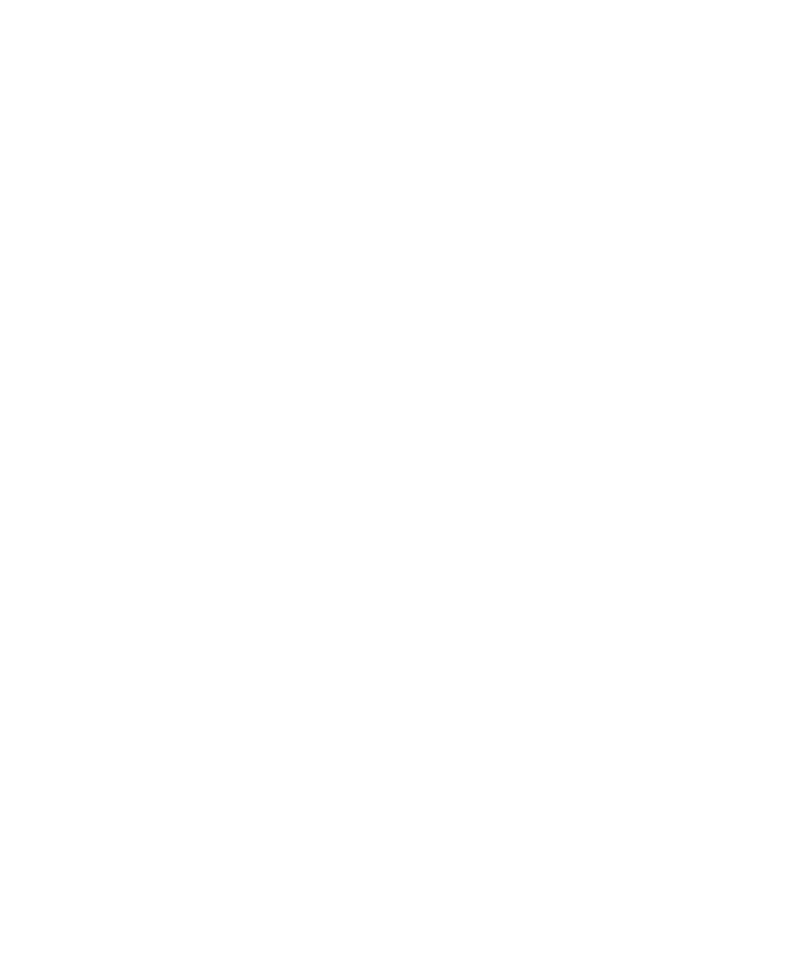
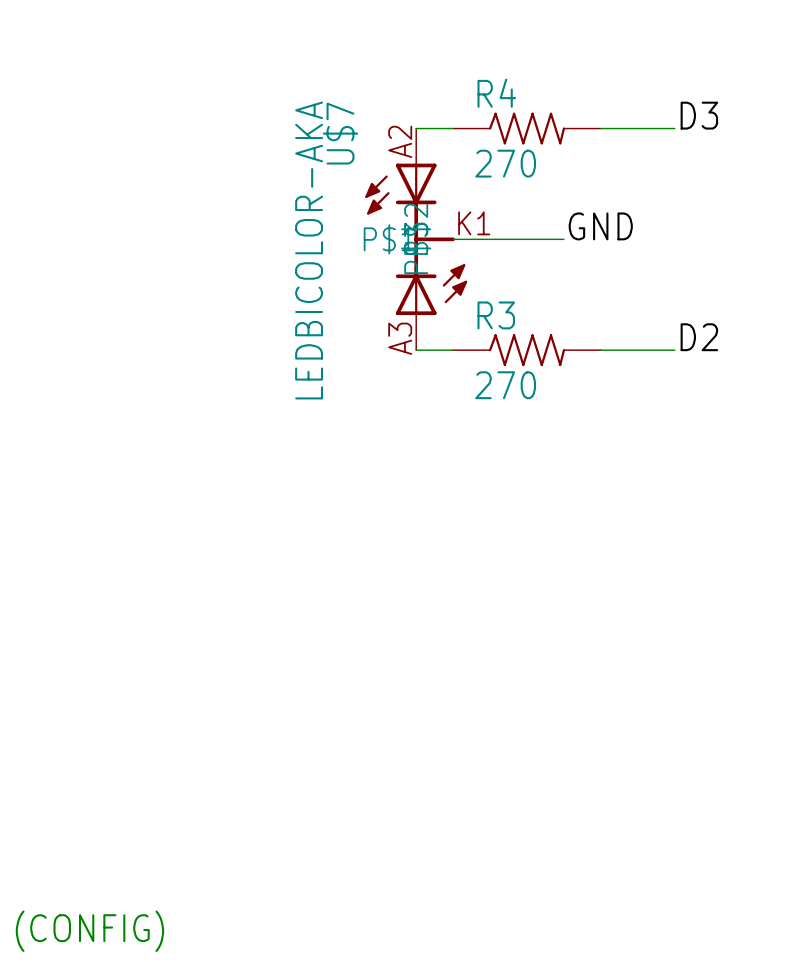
label: none -> D3 (699, 115)
wire: none -> (416, 128) (453, 128)
R4: none -> 270 (527, 128)
wire: none -> (600, 128) (674, 128)
label: none -> GND (600, 226)
U$7: none -> LEDBICOLOR-AKA (416, 239)
wire: none -> (453, 239) (563, 239)
label: none -> D2 (699, 337)
wire: none -> (416, 350) (453, 350)
R3: none -> 270 (527, 350)
wire: none -> (600, 350) (674, 350)
text: none -> (CONFIG) (89, 931)

